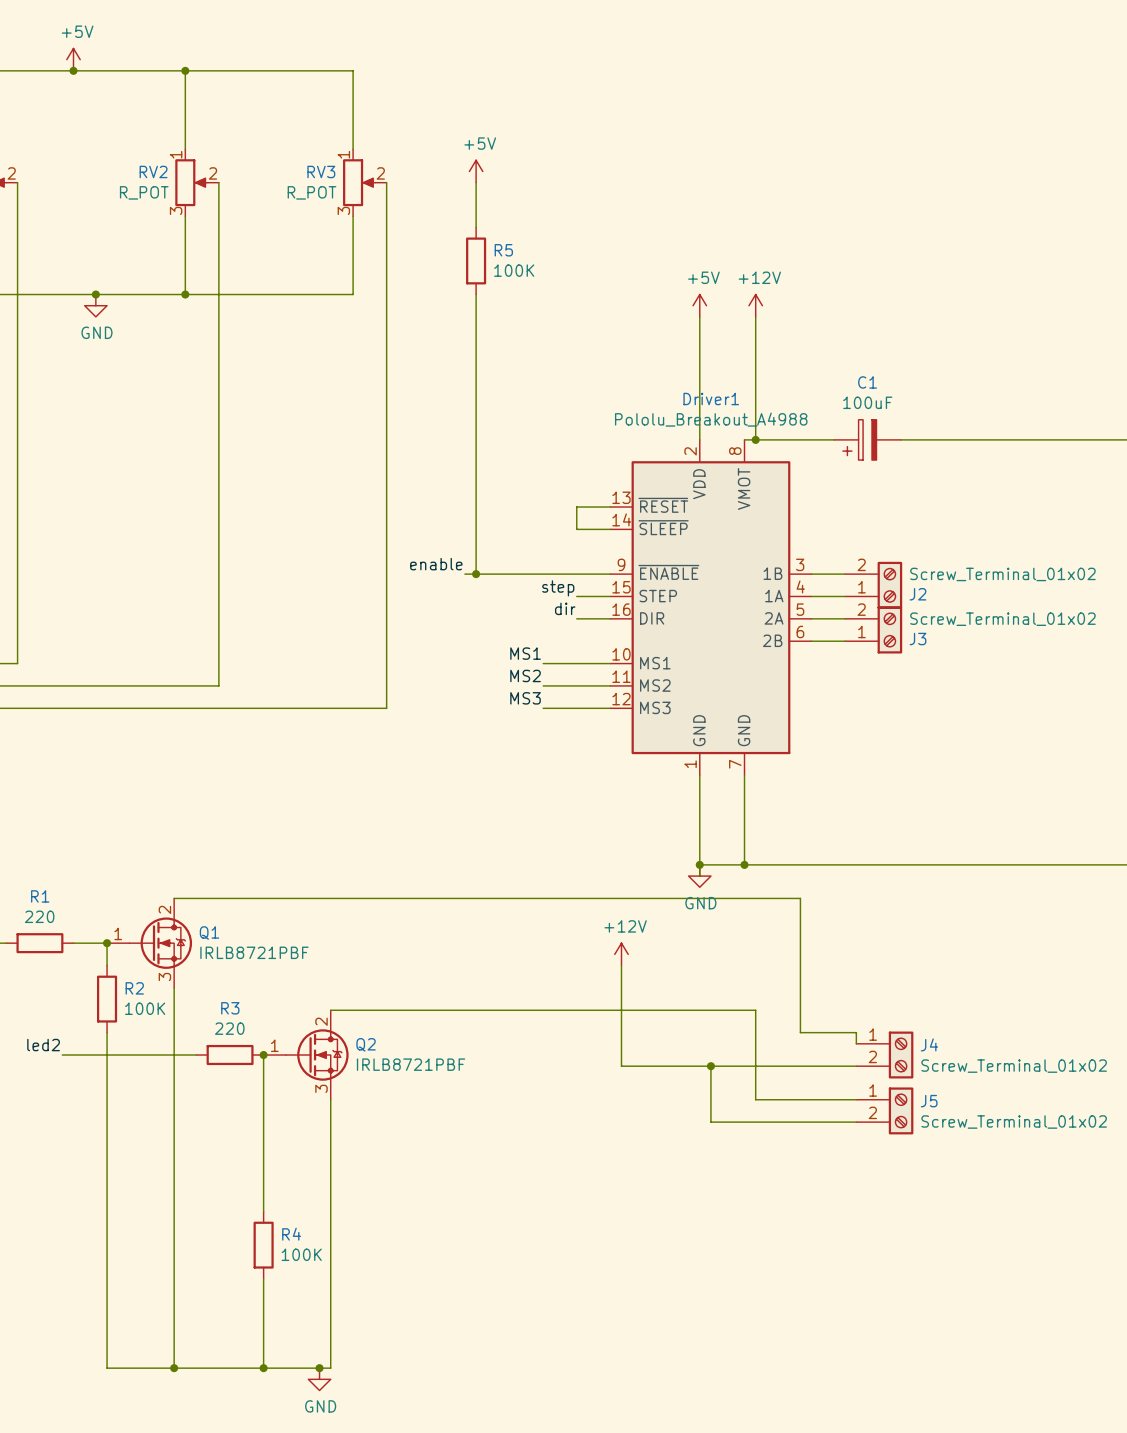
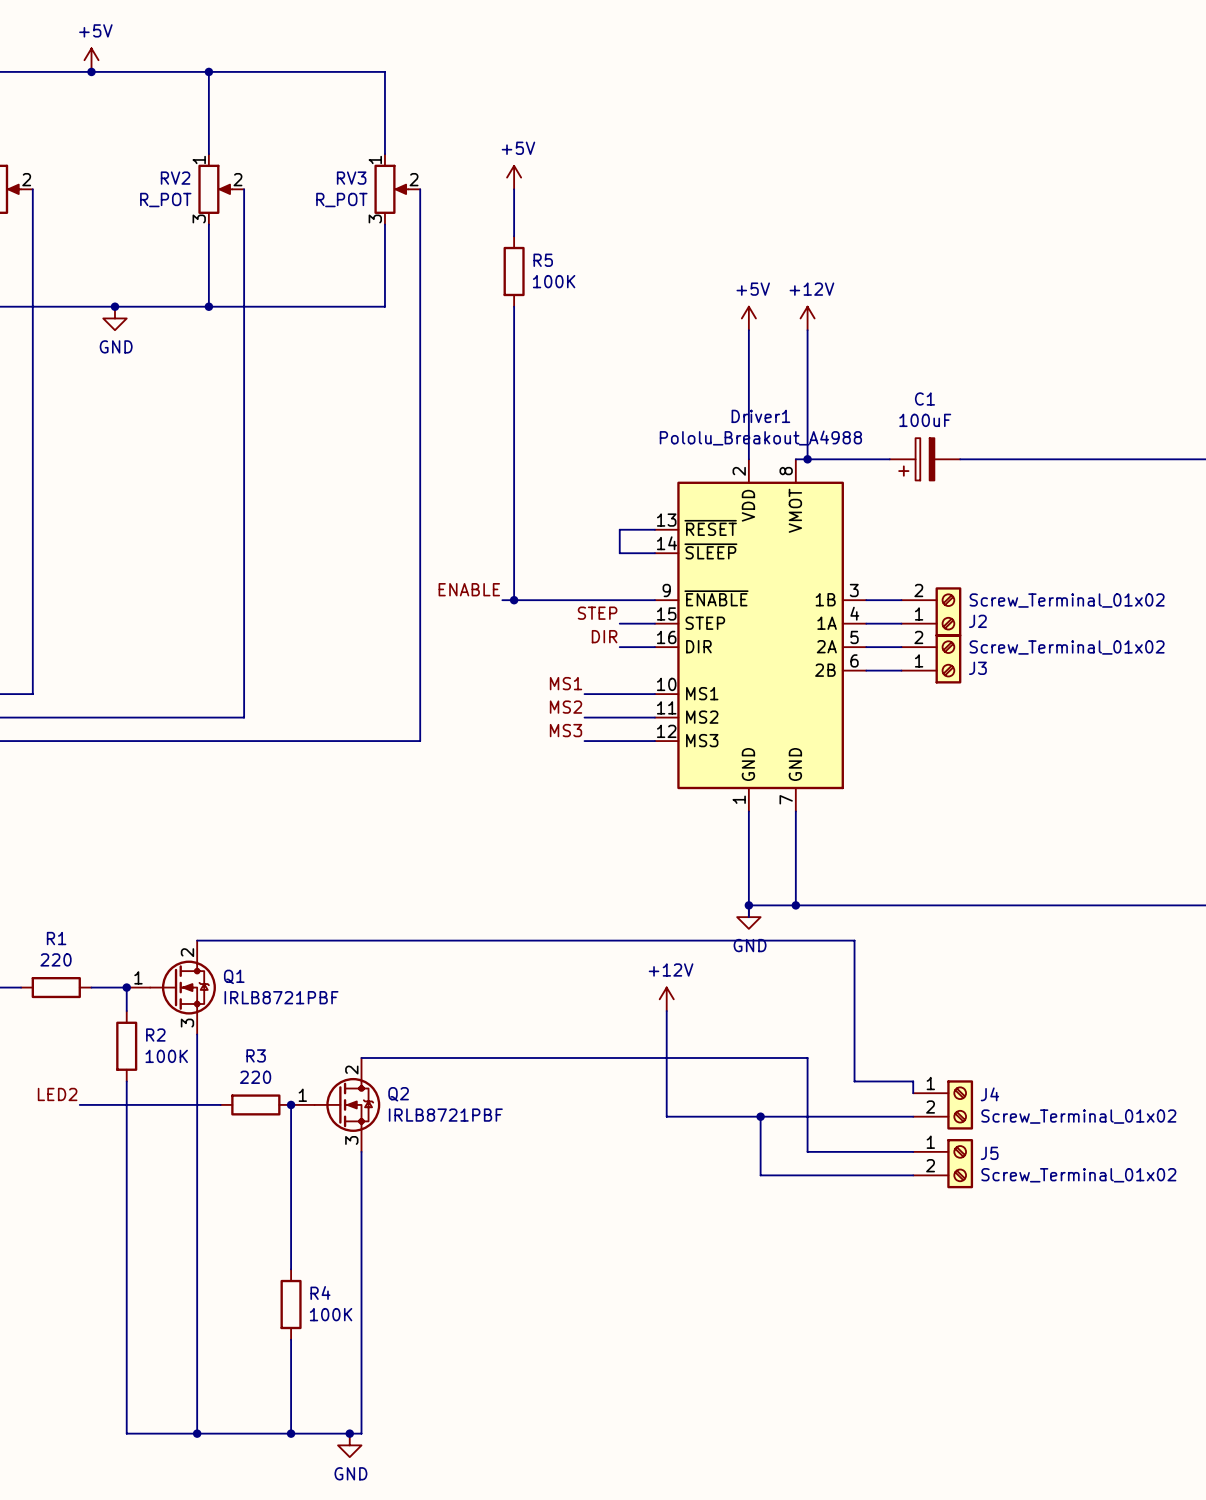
label: enable (436, 564) -> ENABLE (469, 589)
label: step (558, 588) -> STEP (597, 613)
label: dir (565, 608) -> DIR (604, 636)
label: led2 (43, 1045) -> LED2 (57, 1094)

